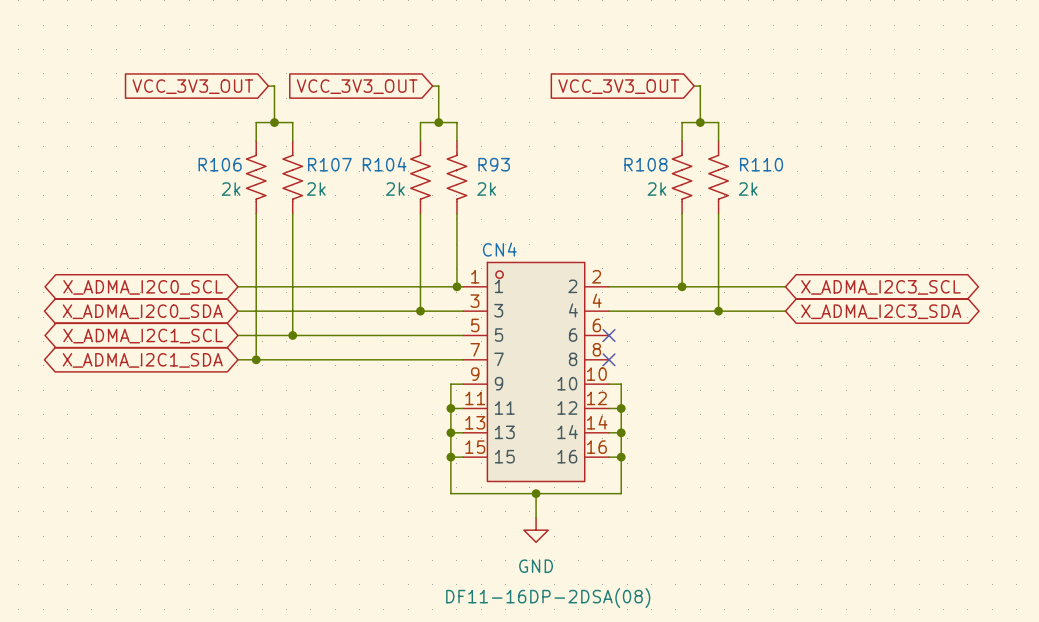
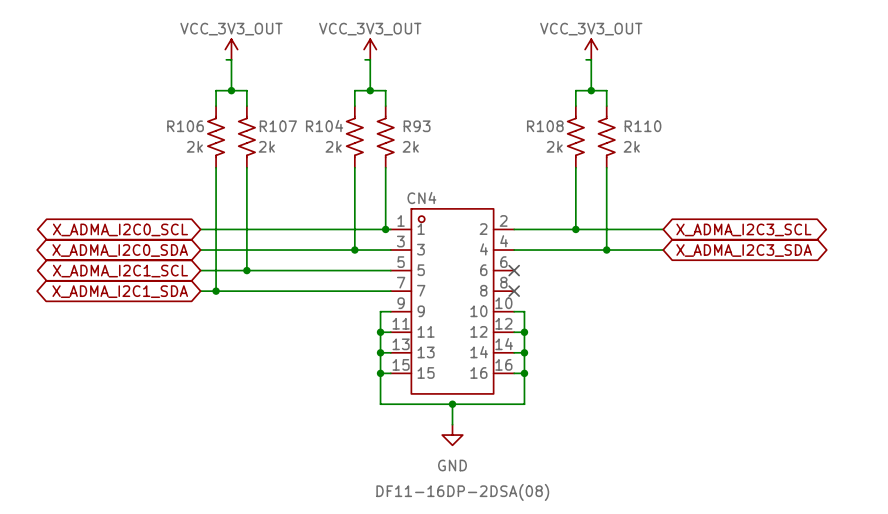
power symbol: none -> VCC_3V3_OUT (231, 49)
power symbol: none -> VCC_3V3_OUT (370, 49)
power symbol: none -> VCC_3V3_OUT (591, 49)
global label: VCC_3V3_OUT (192, 86) -> none
global label: VCC_3V3_OUT (357, 86) -> none
global label: VCC_3V3_OUT (618, 86) -> none

